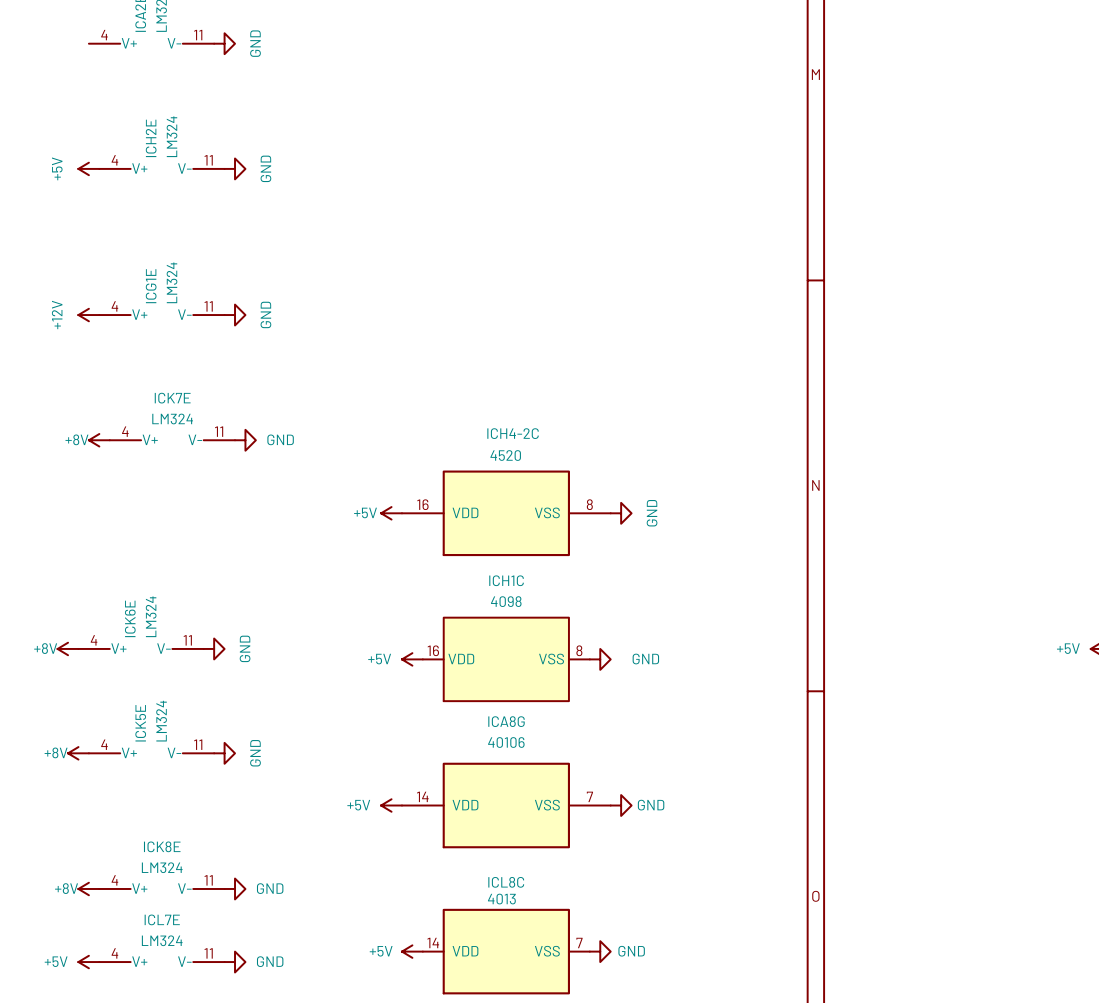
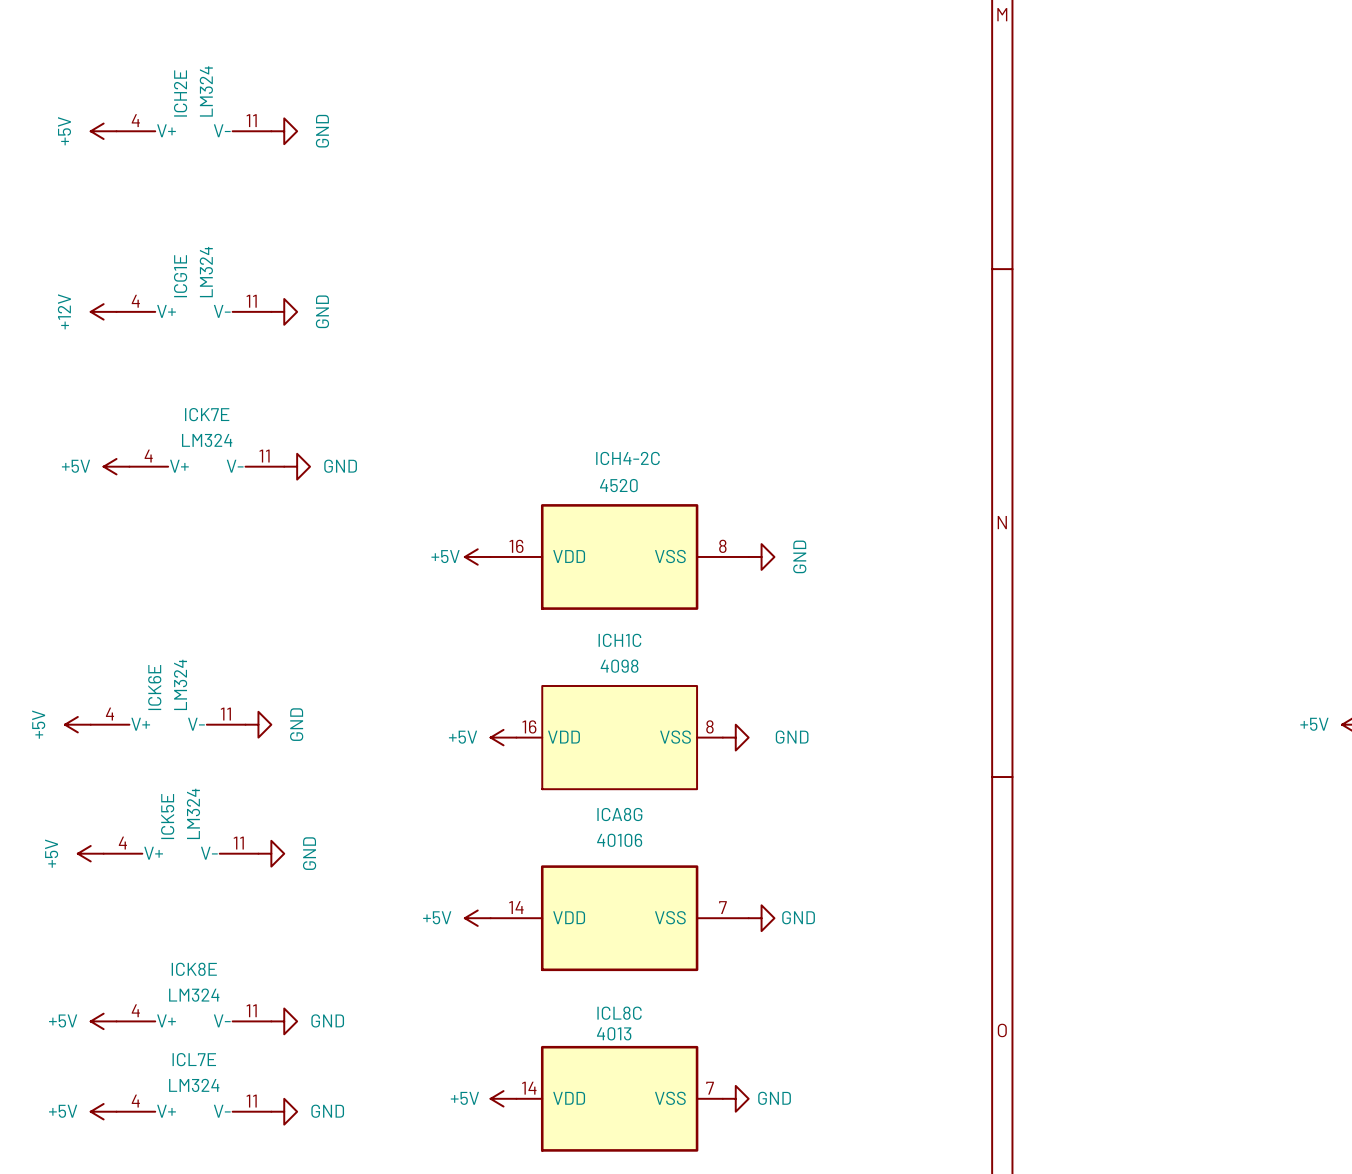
power symbol: +8V (99, 440) -> +5V (116, 466)
power symbol: +8V (68, 648) -> +5V (77, 724)
power symbol: +8V (78, 753) -> +5V (90, 853)
power symbol: +8V (88, 888) -> +5V (103, 1021)

